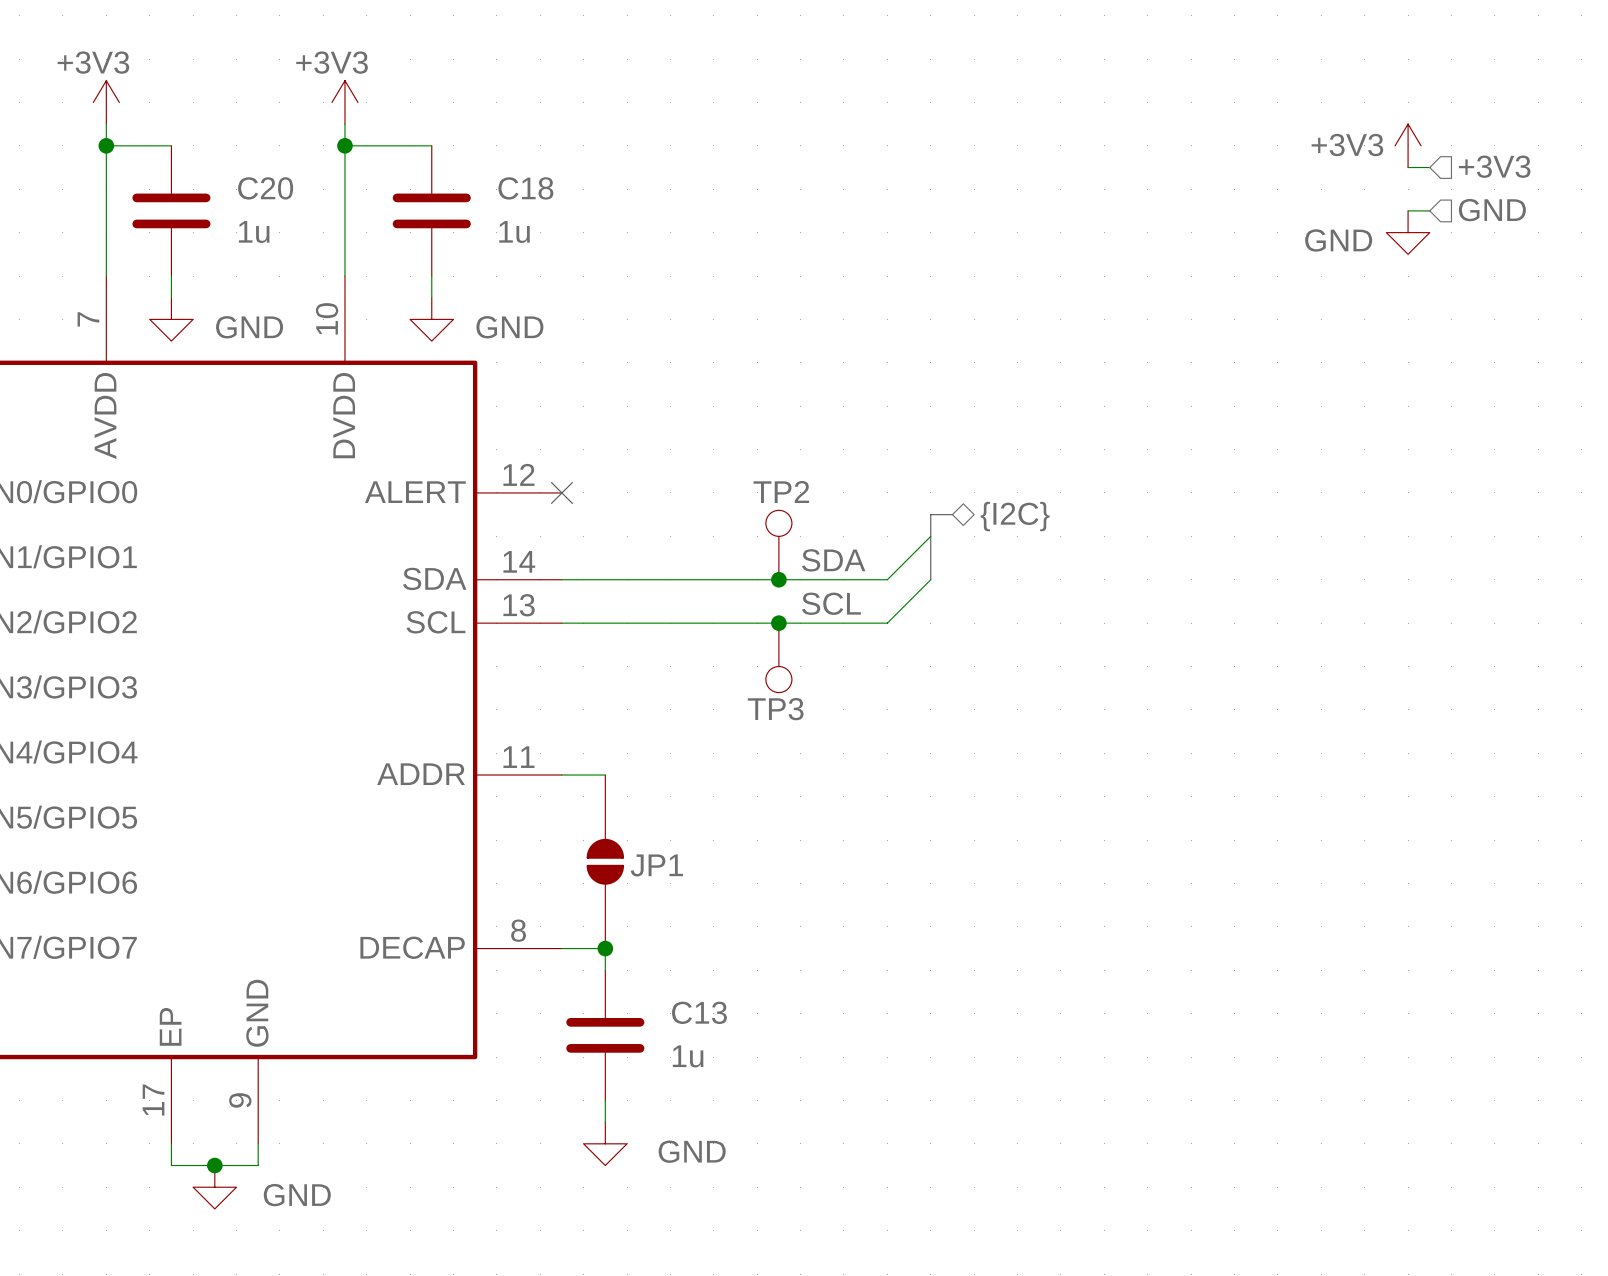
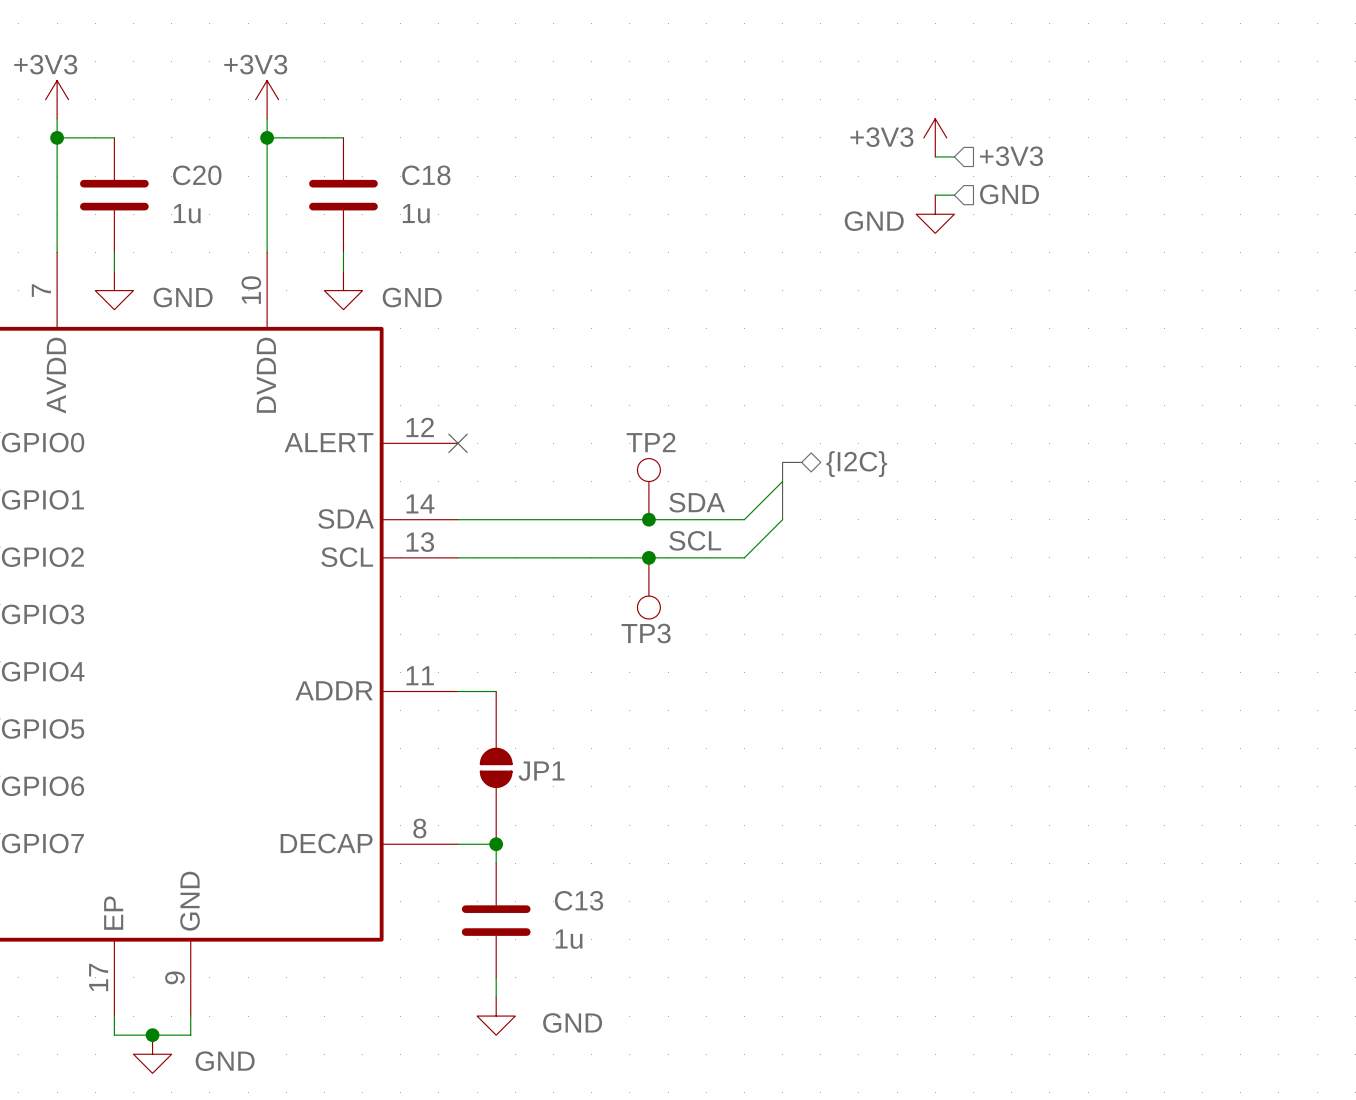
power symbol position: +3V3 (1408, 145) -> +3V3 (935, 137)
hierarchical label position: +3V3 (1494, 166) -> +3V3 (1011, 156)
wire: (1408, 167) (1429, 167) -> (935, 156) (954, 156)
wire: (1408, 210) (1429, 210) -> (935, 195) (954, 195)
hierarchical label position: GND (1492, 210) -> GND (1009, 194)
power symbol position: GND (1408, 232) -> GND (935, 214)

